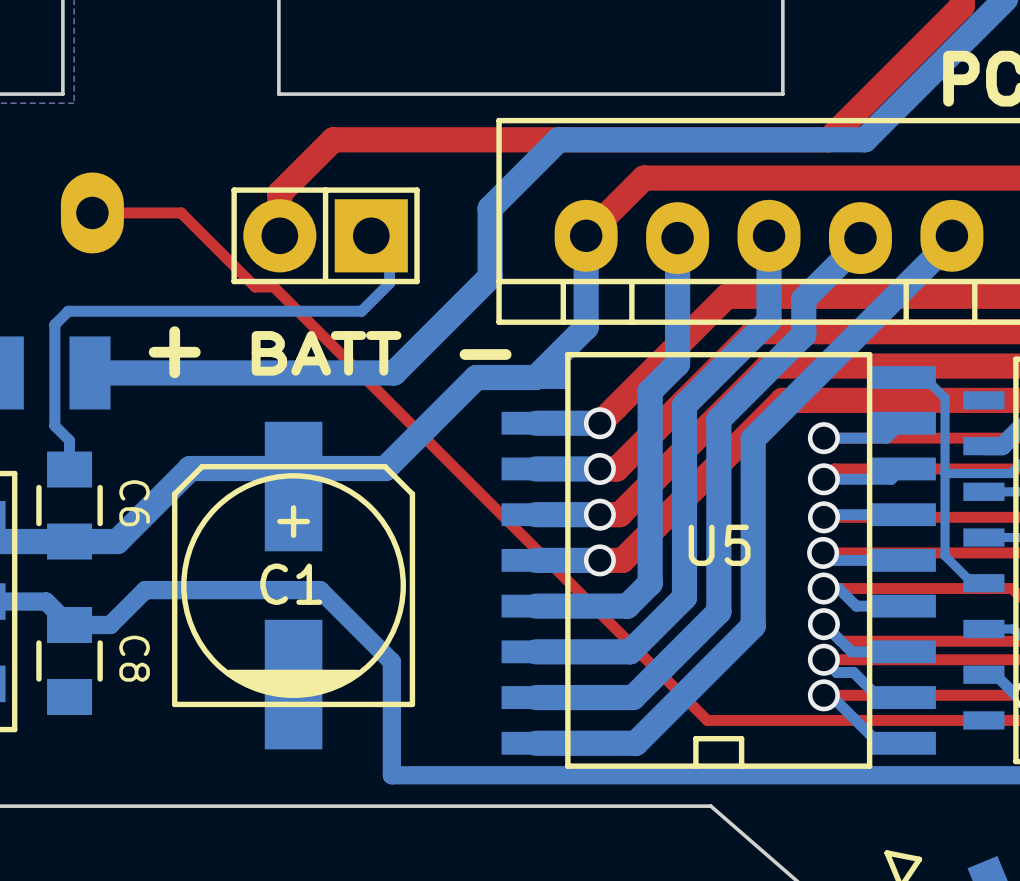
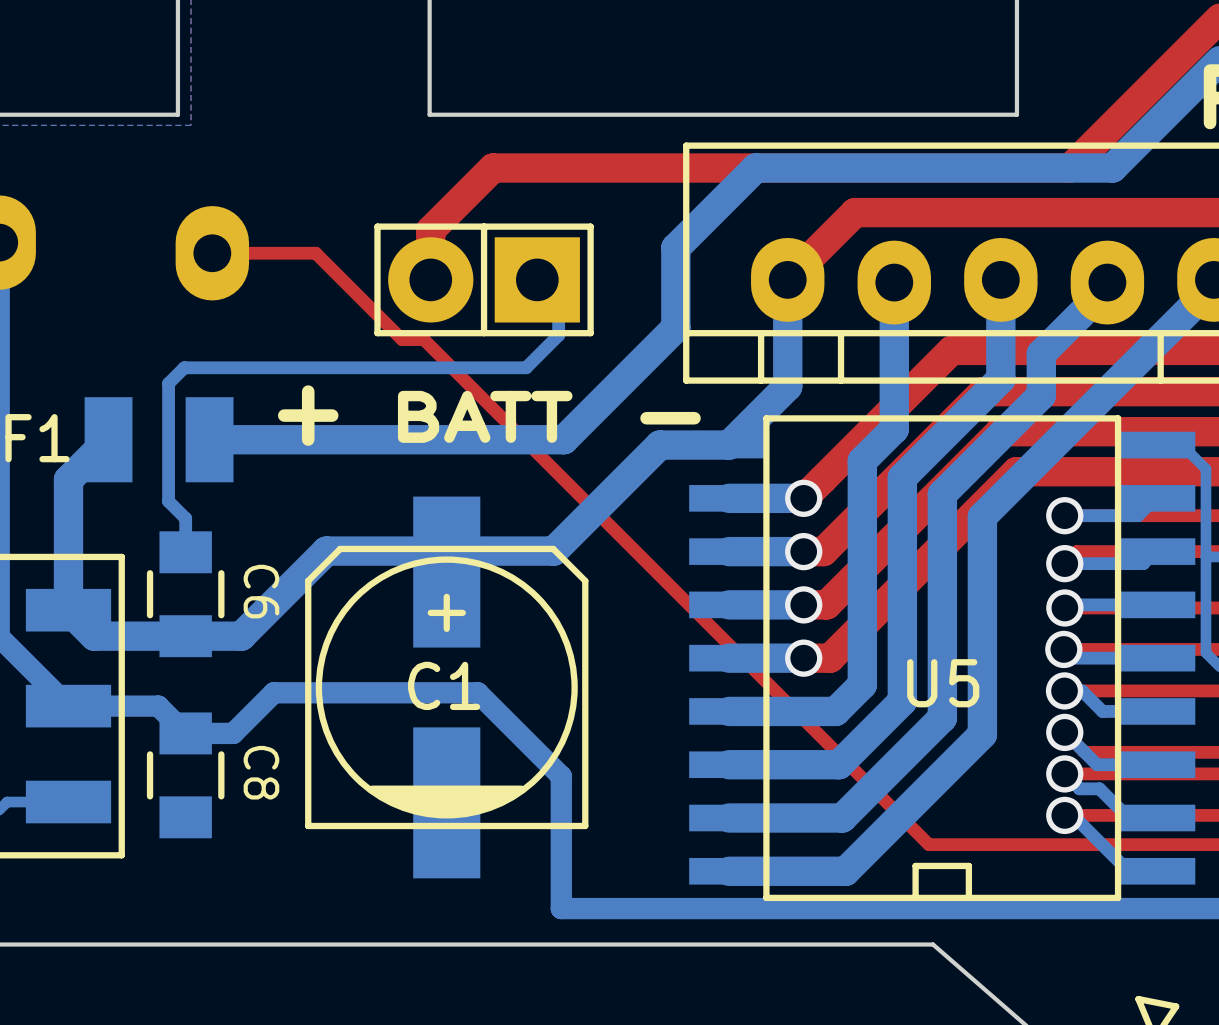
U5 name position: U5 (719, 545) -> U5 (943, 683)

